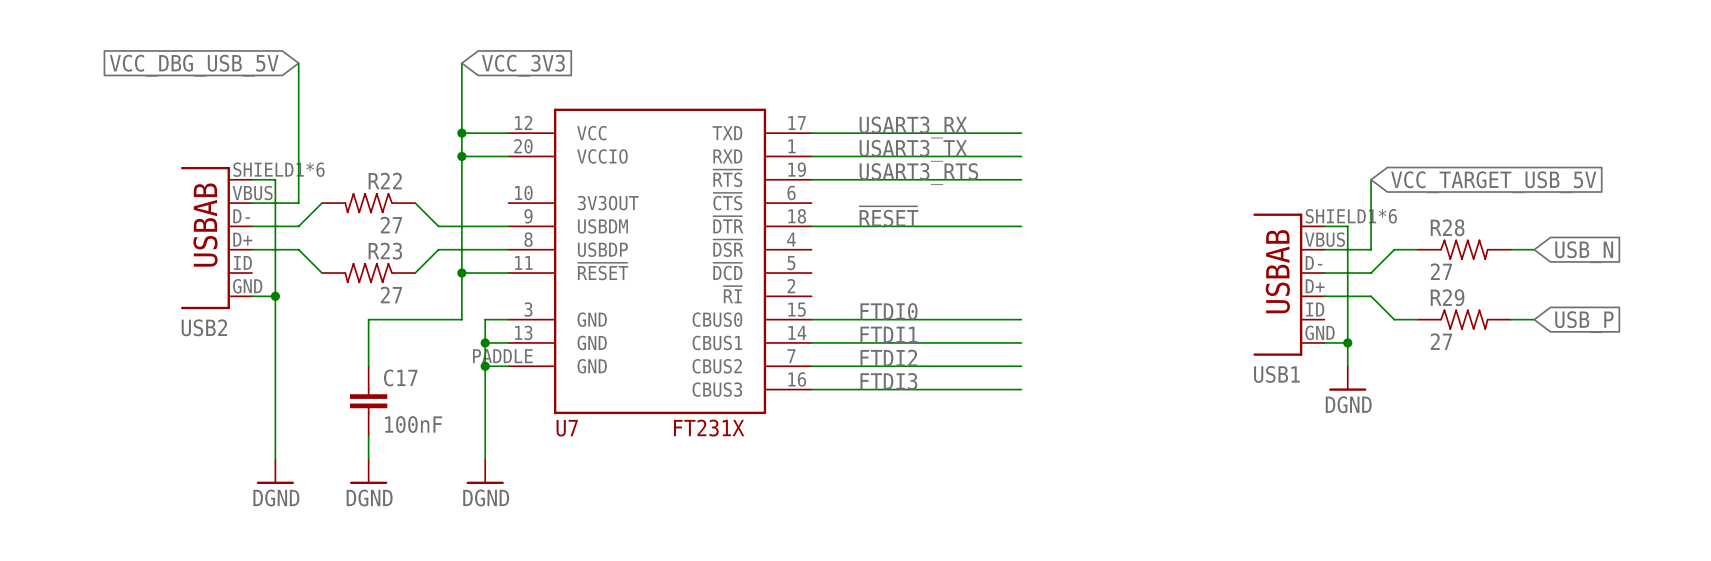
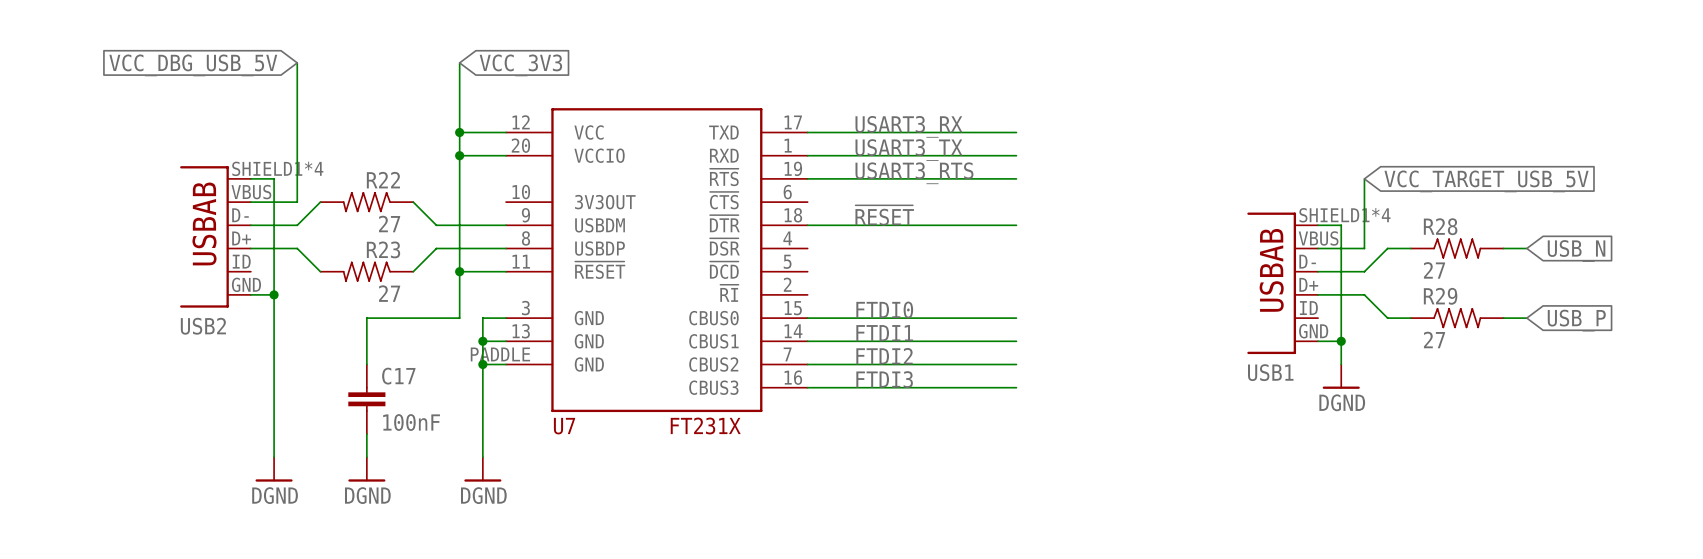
USB2 pin number: SHIELD1*6 (278, 169) -> SHIELD1*4 (277, 168)
USB1 pin number: SHIELD1*6 (1351, 216) -> SHIELD1*4 (1344, 215)

